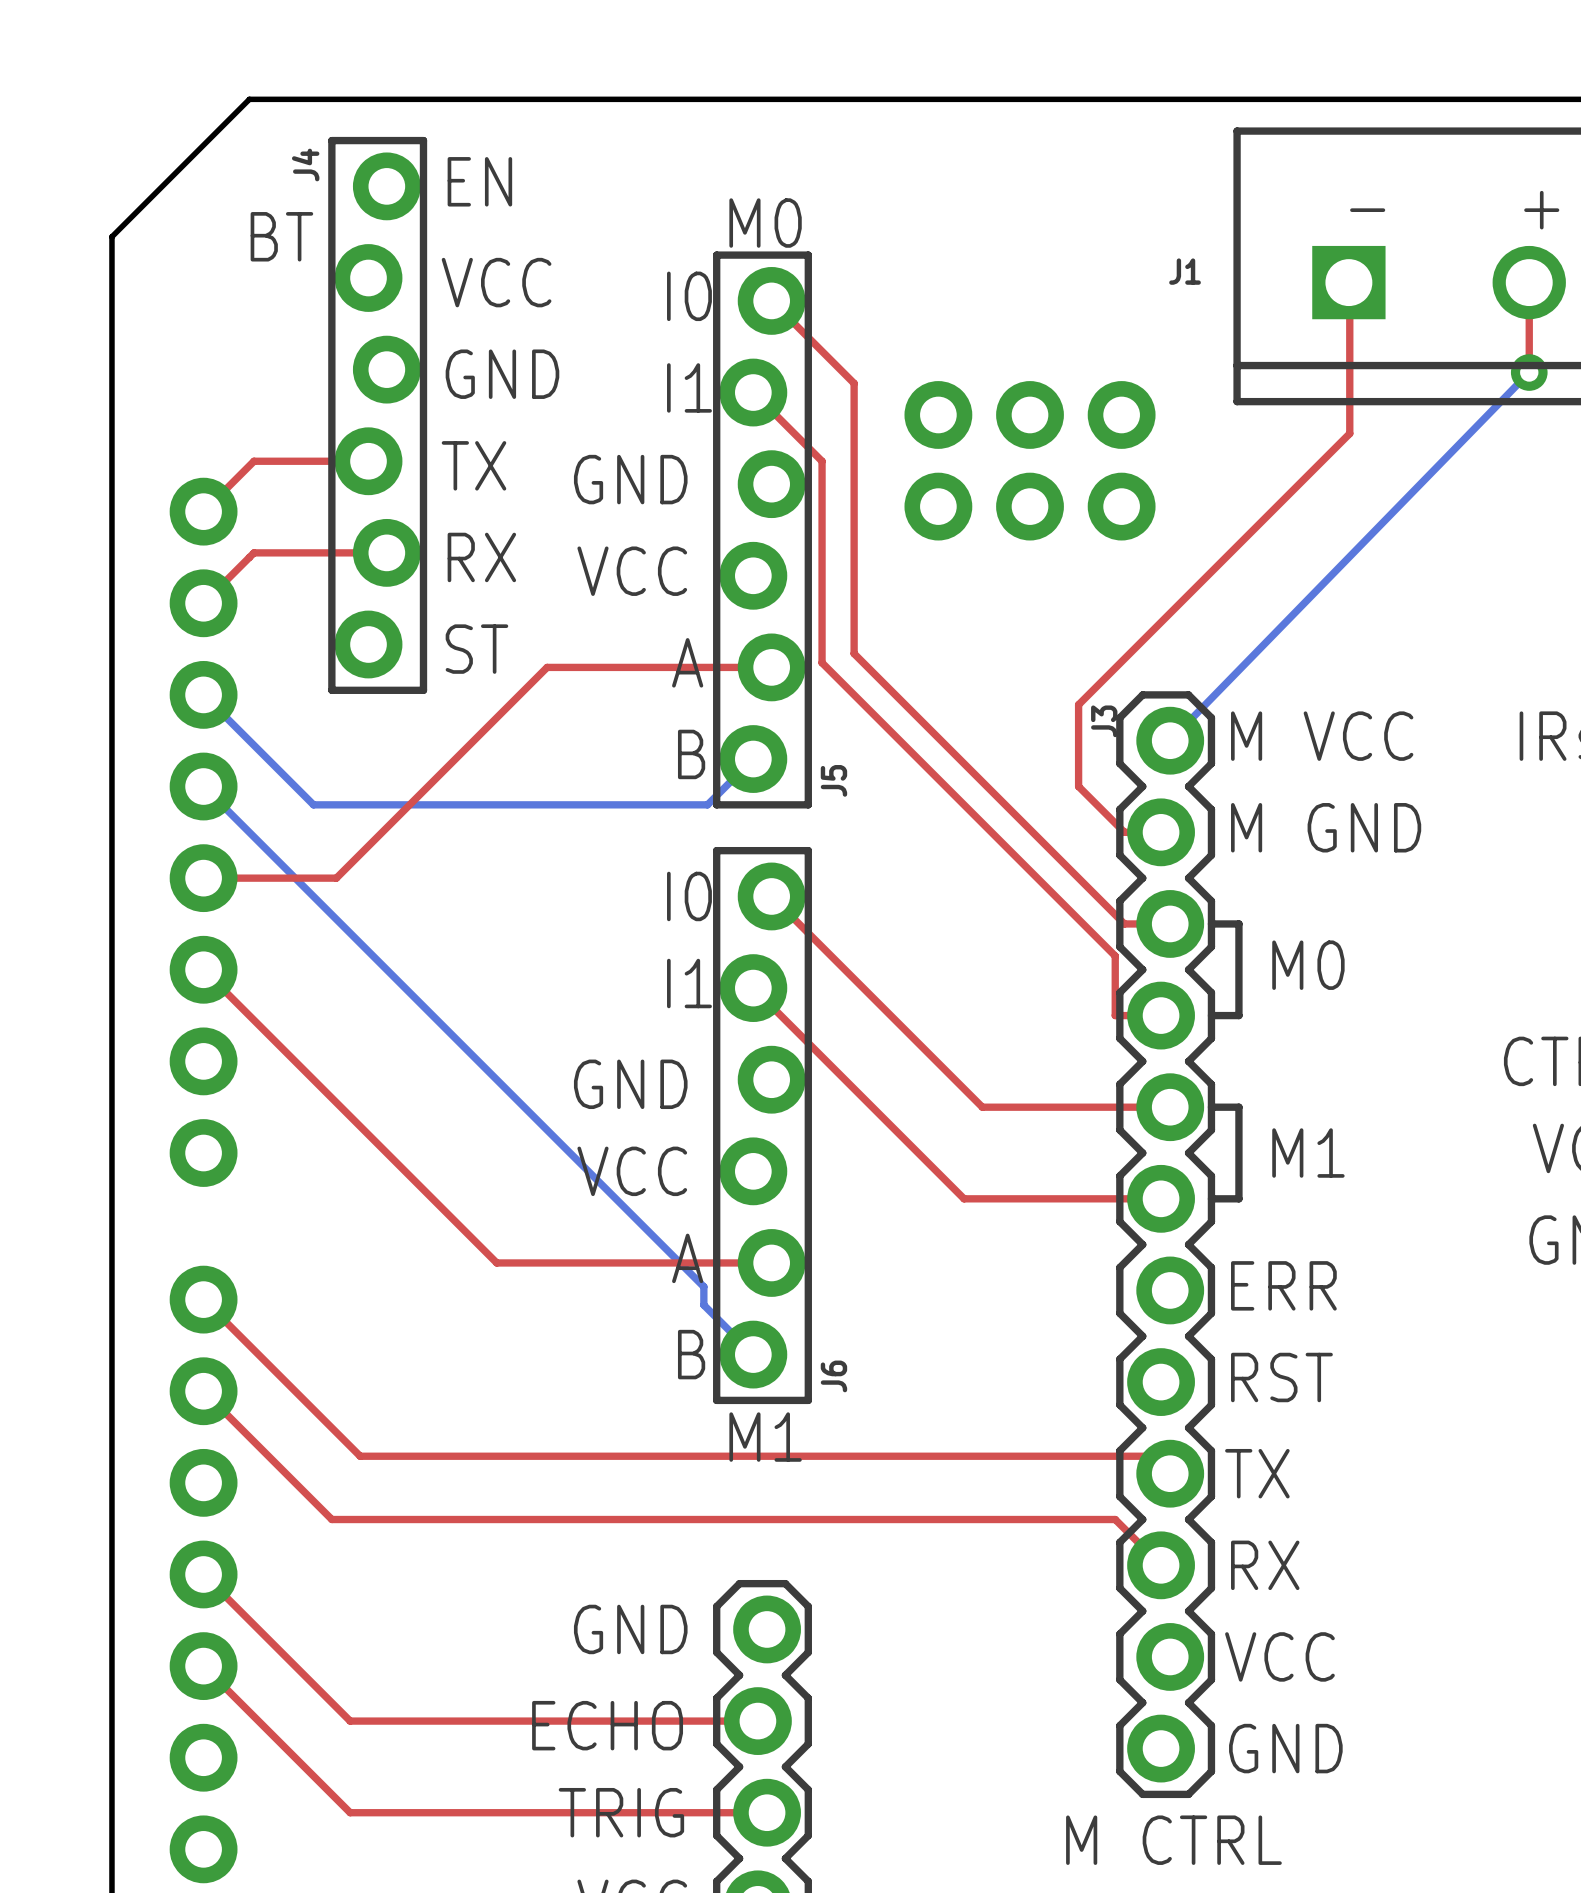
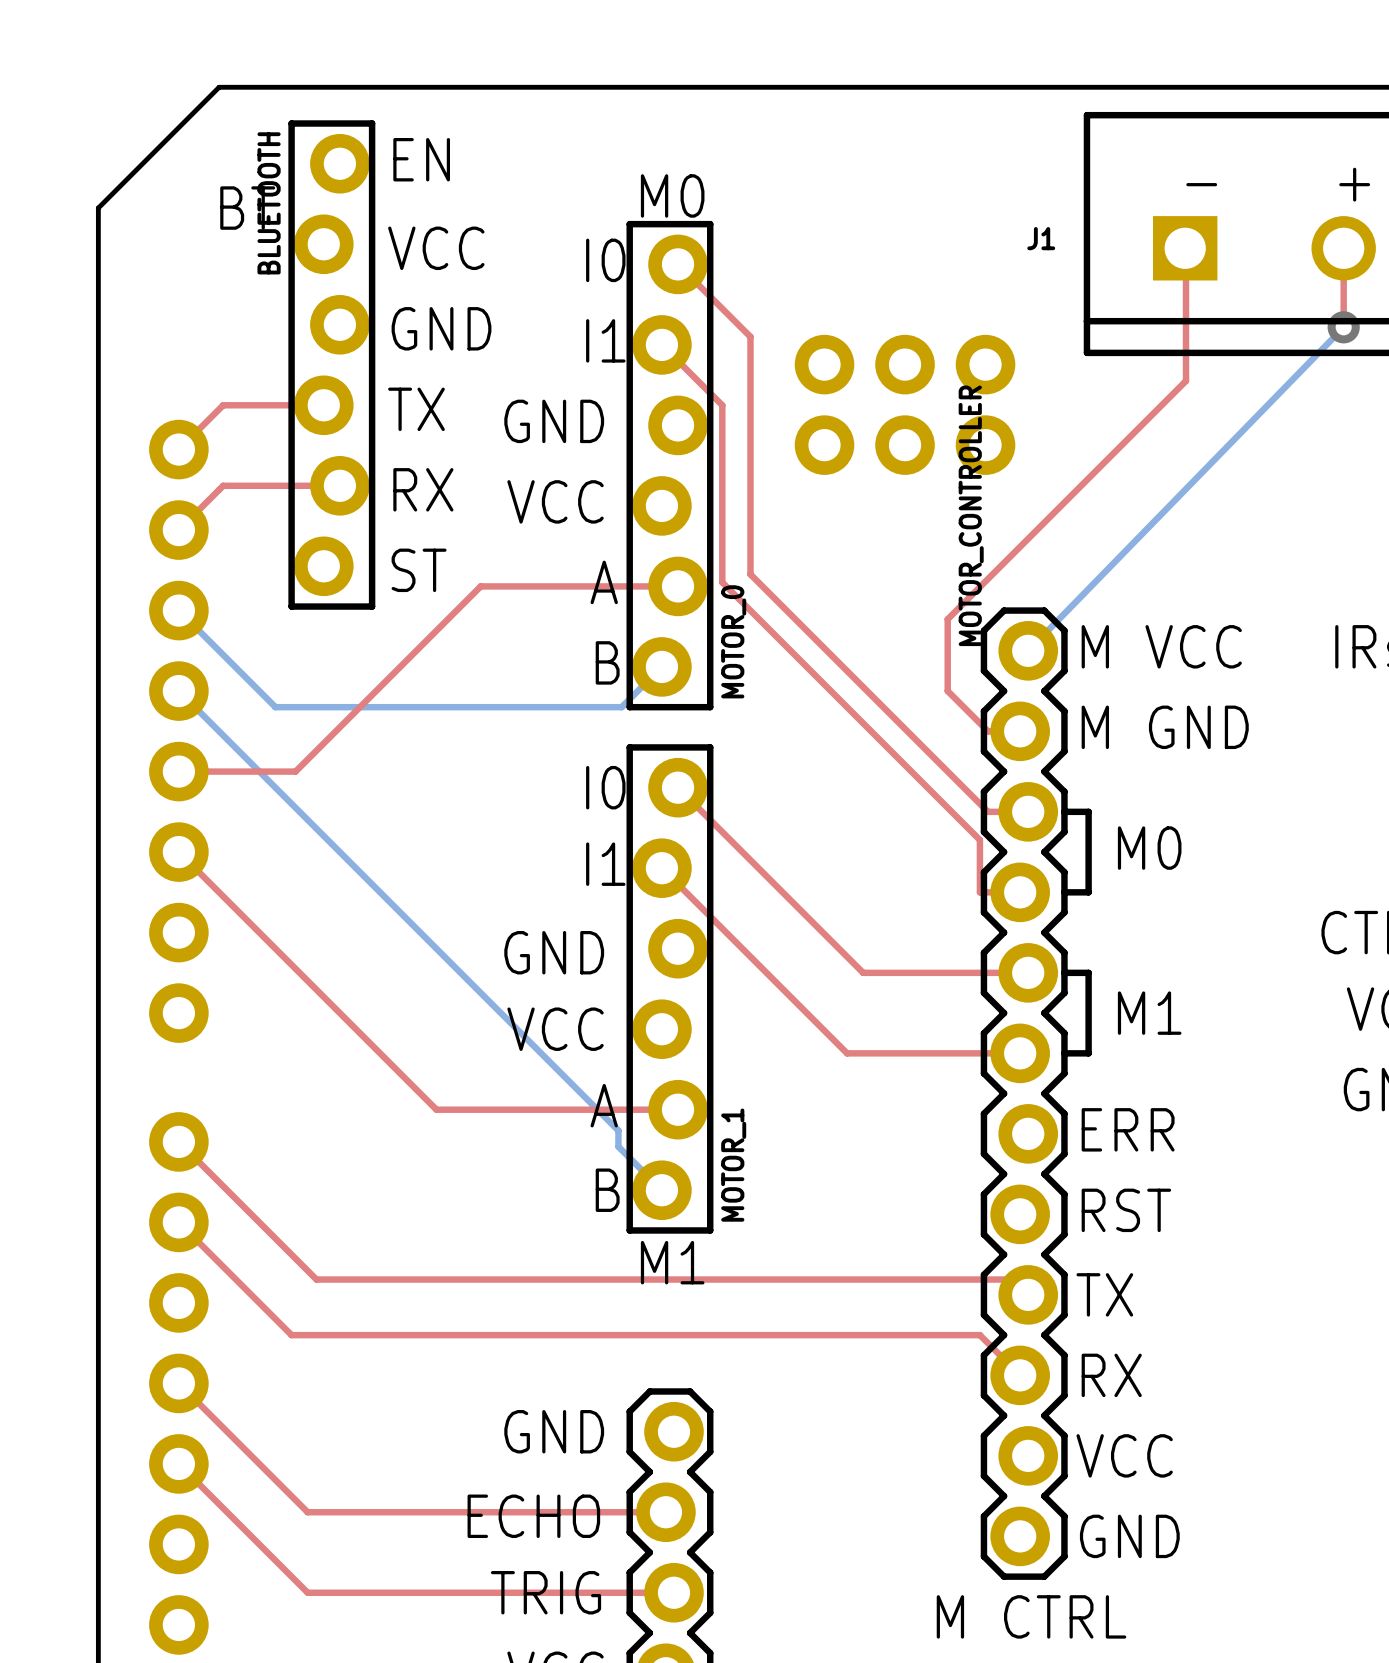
J4 name: J4 (305, 165) -> BLUETOOTH (269, 203)
J3 name: J3 (1104, 721) -> MOTOR_CONTROLLER (971, 515)
J5 name: J5 (833, 780) -> MOTOR_0 (733, 641)
J6 name: J6 (833, 1376) -> MOTOR_1 (733, 1165)

